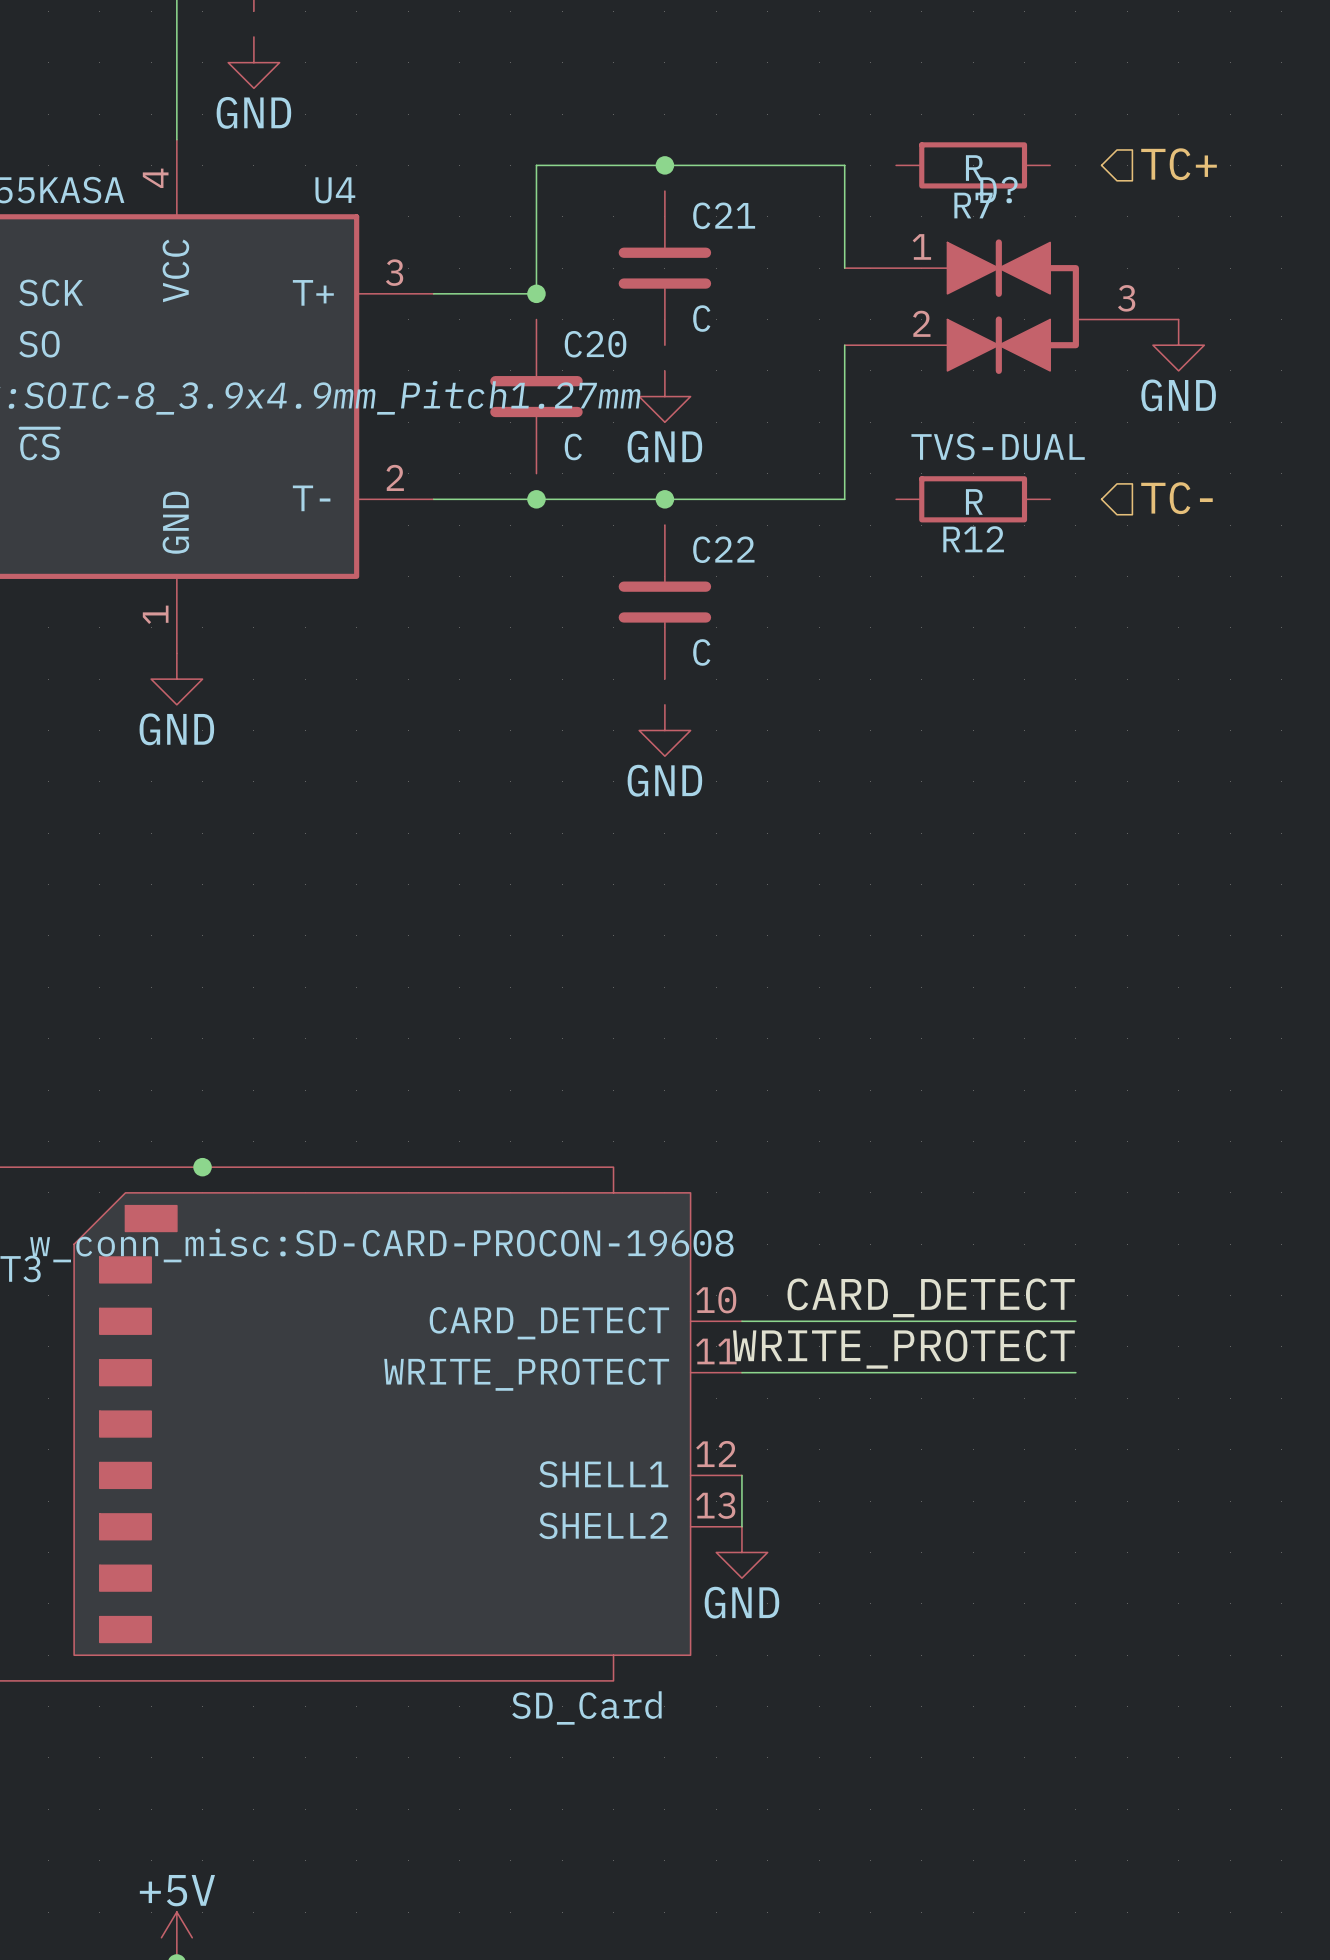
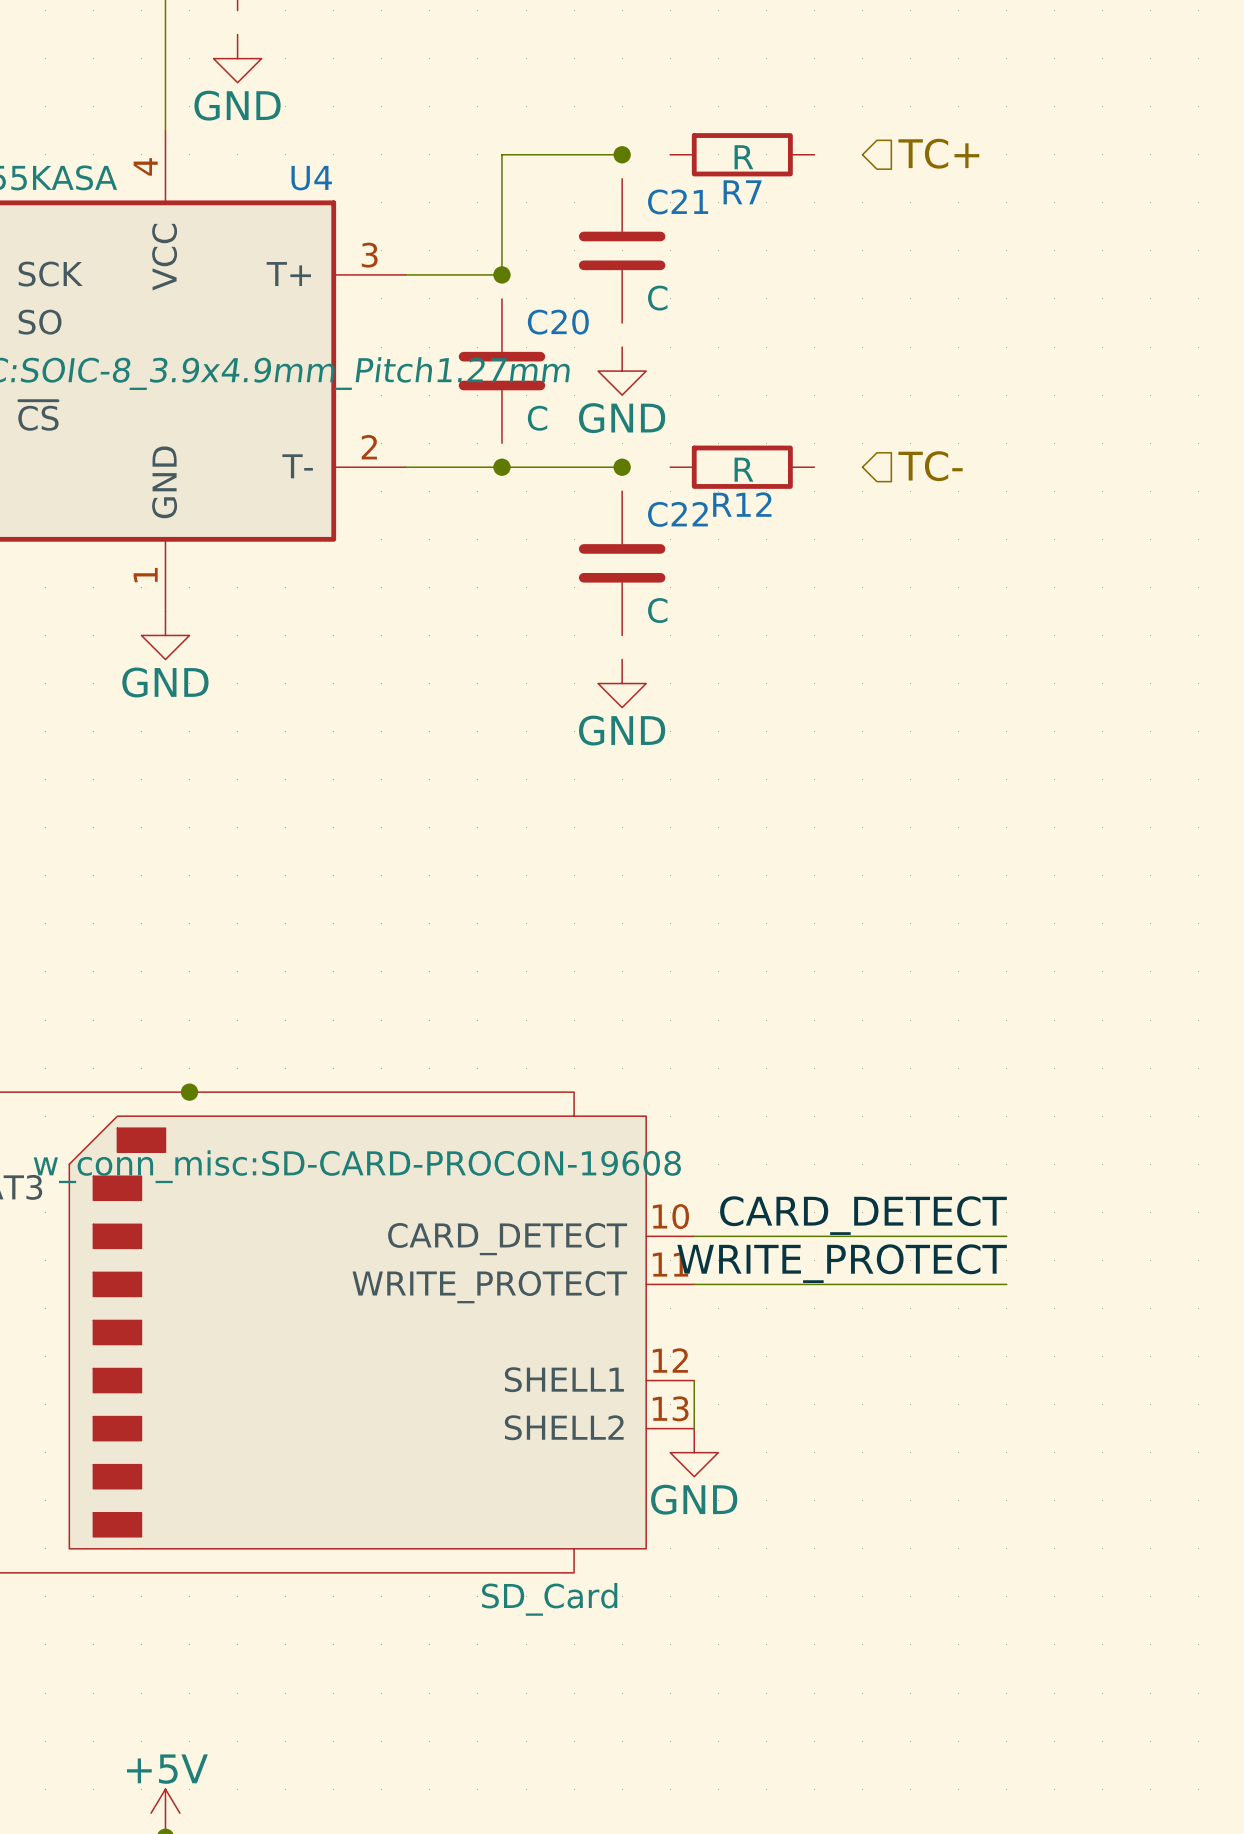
hierarchical label position: TC+ (1179, 164) -> TC+ (938, 153)
wire: (664, 165) (844, 165) (844, 268) -> none
R7 position: (973, 165) -> (742, 154)
D?: TVS-DUAL (1011, 306) -> none
wire: (844, 345) (844, 499) (664, 499) -> none
power symbol: GND (1178, 345) -> none
hierarchical label position: TC- (1176, 498) -> TC- (930, 466)
R12 position: (973, 499) -> (742, 467)

